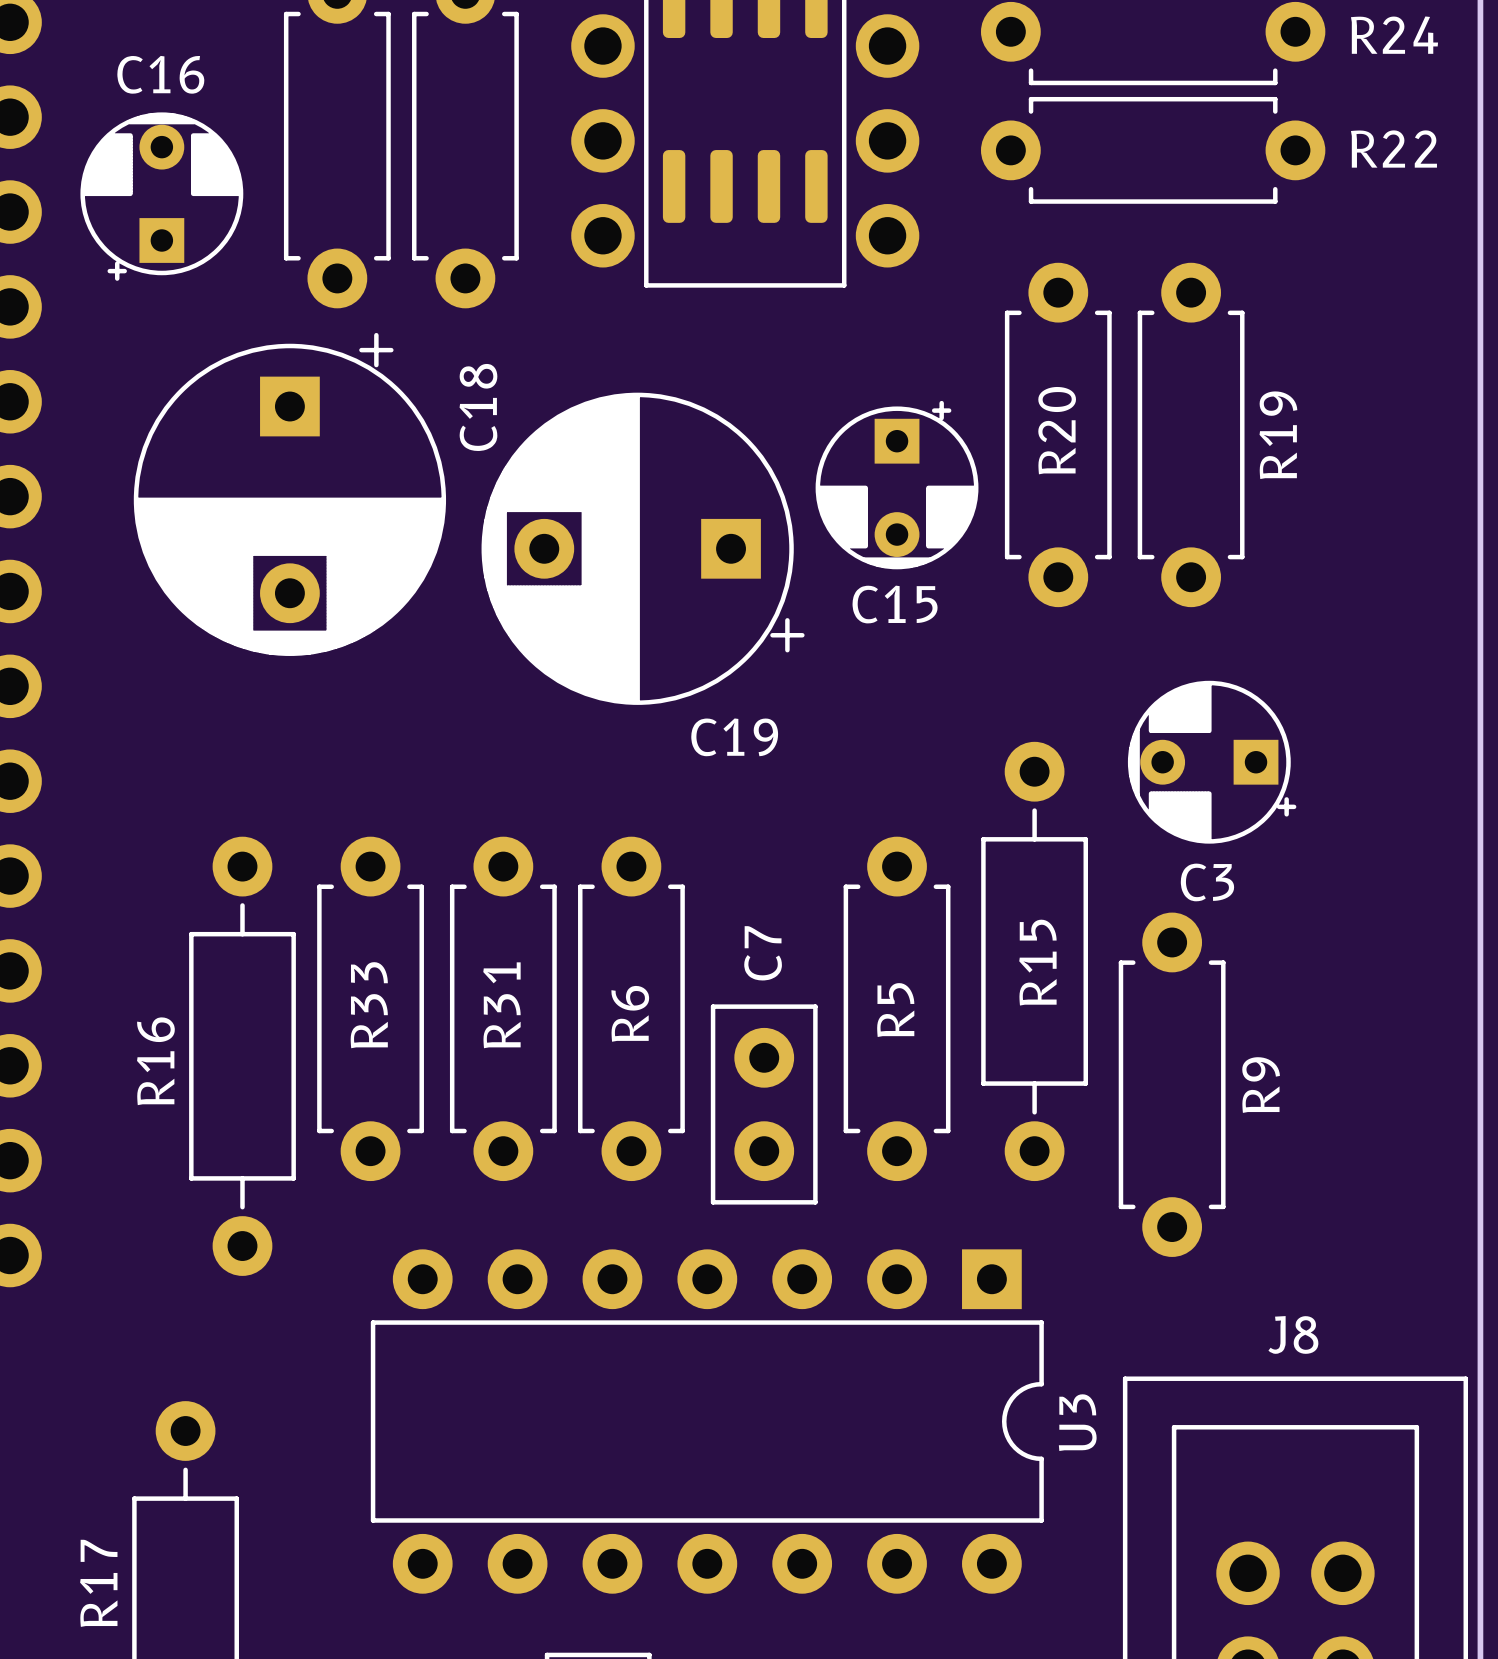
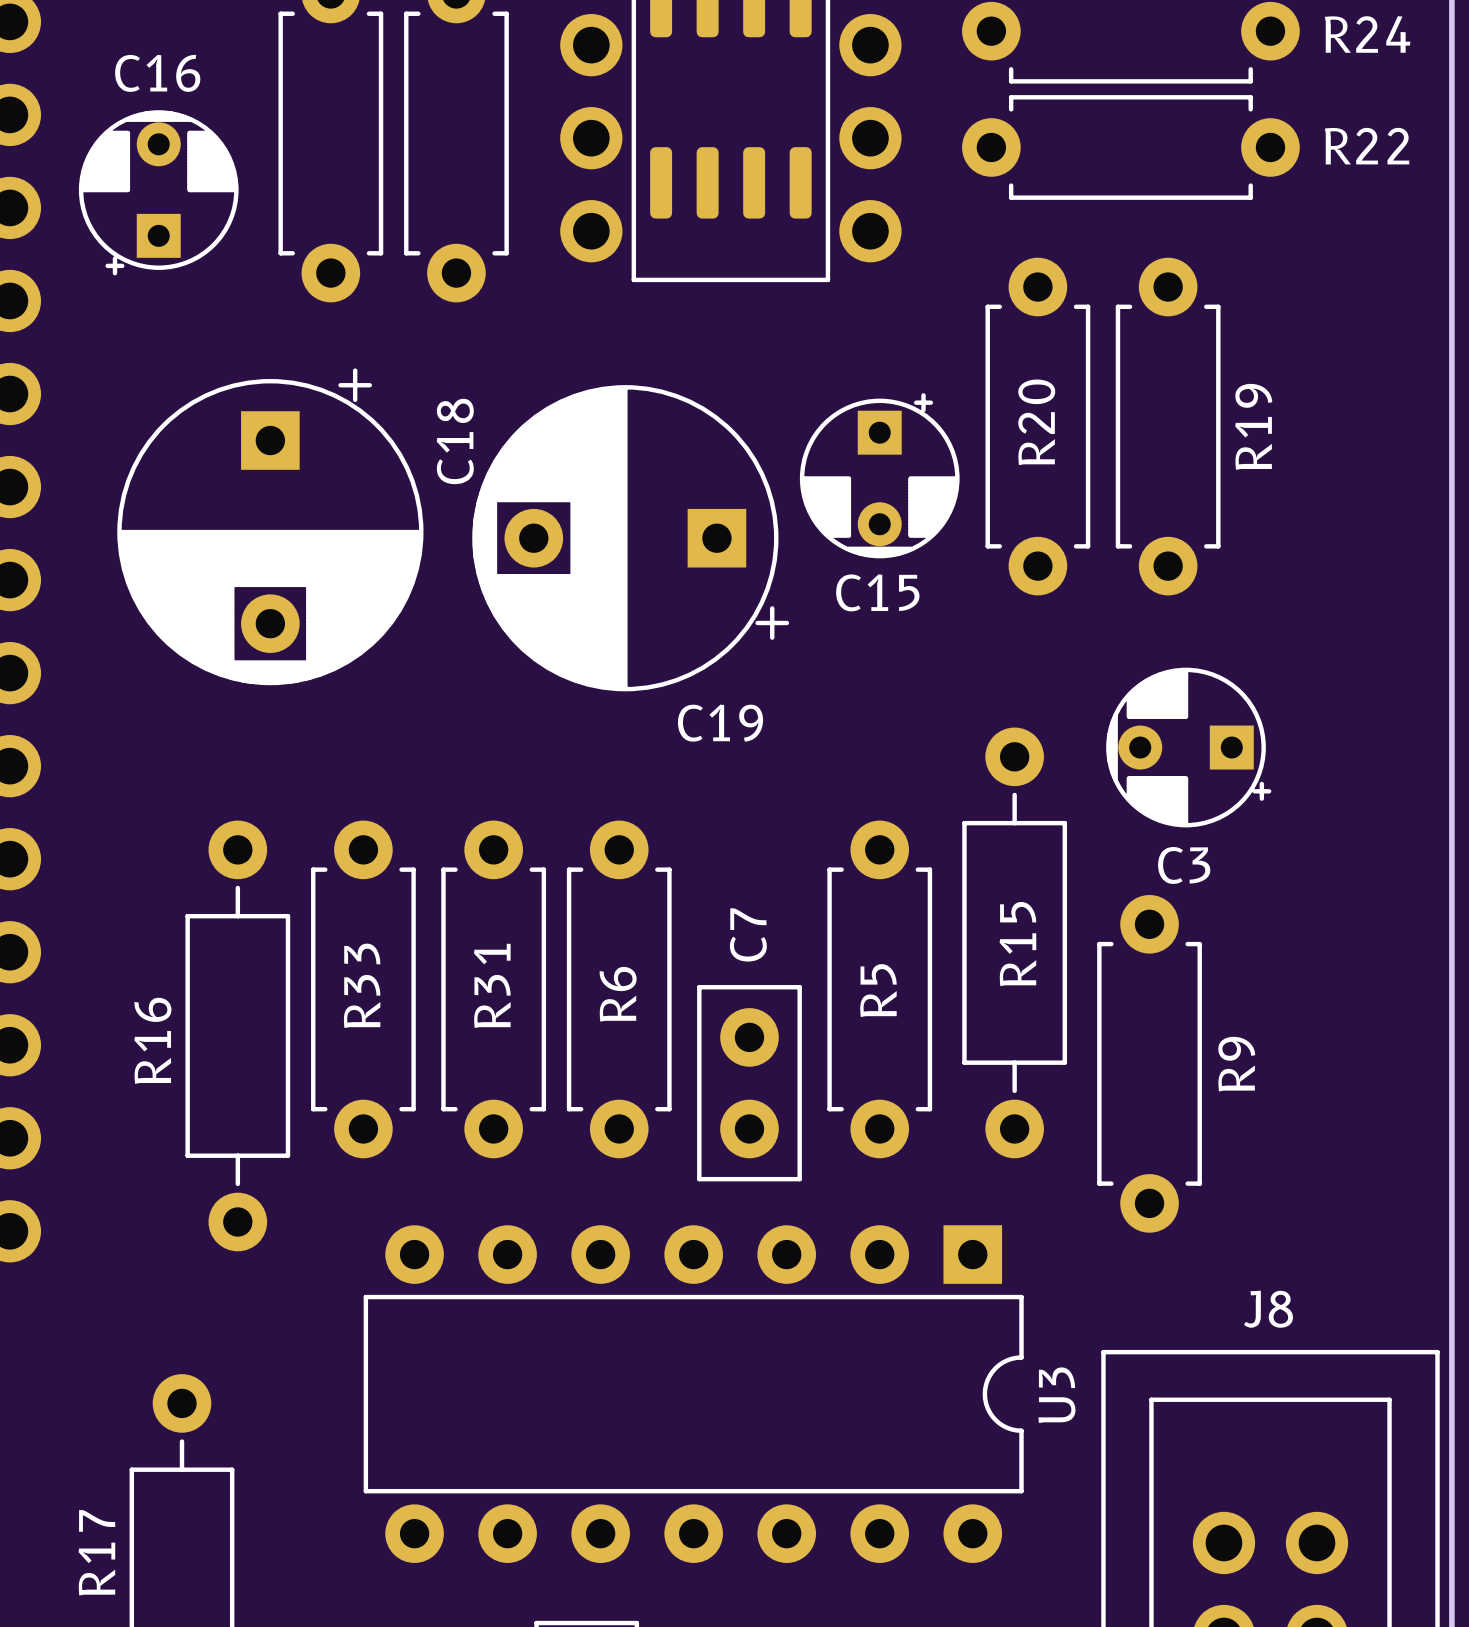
C18 position: (289, 494) -> (270, 526)

